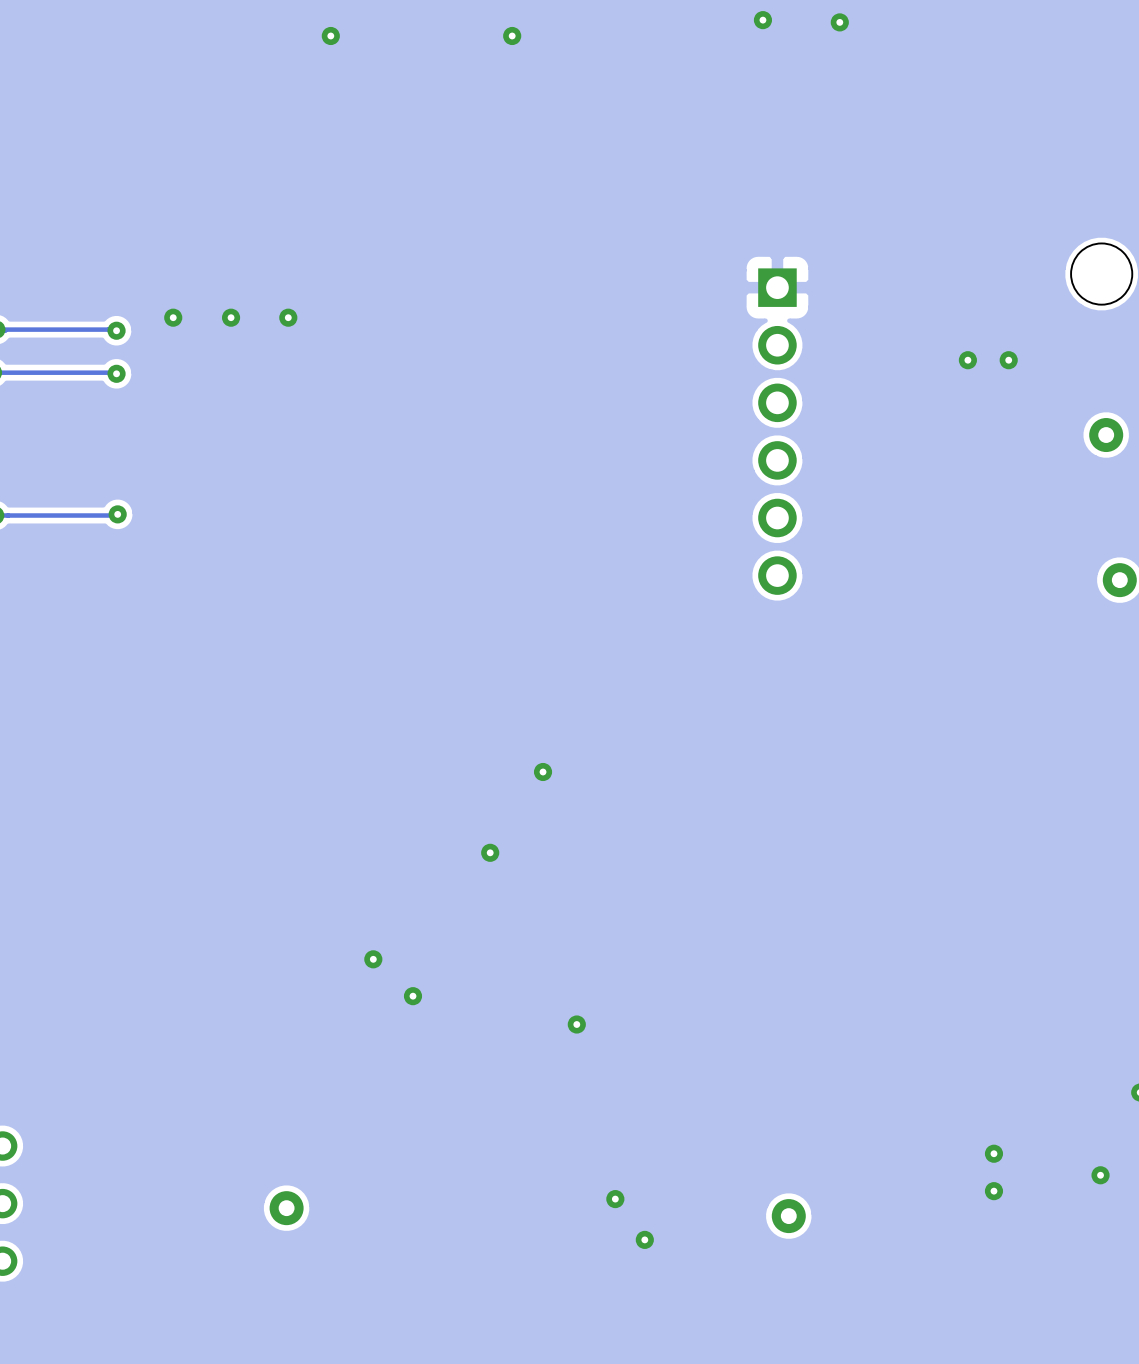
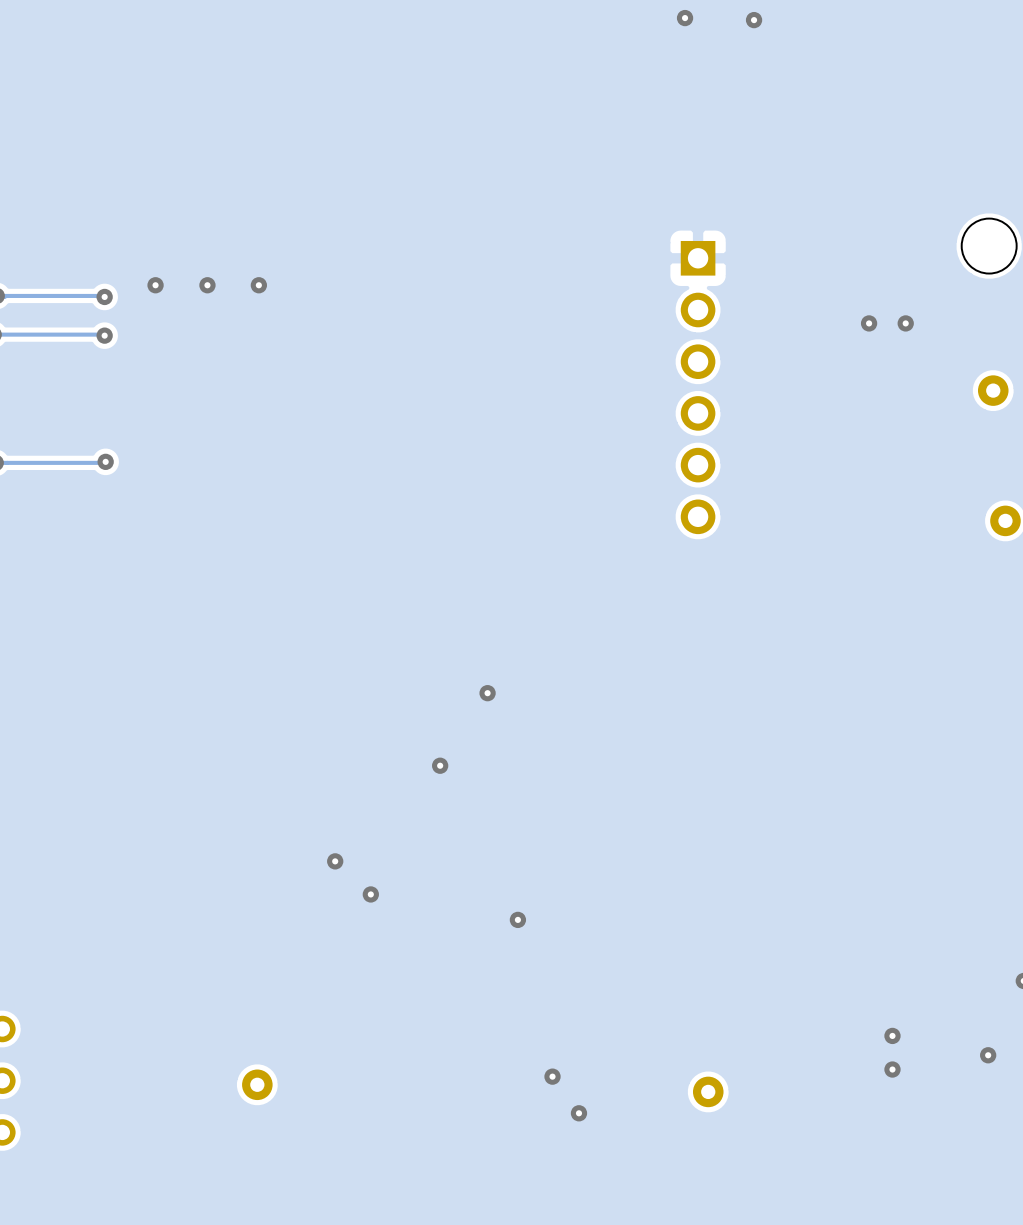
via: (330, 35) -> none
via: (512, 35) -> none

